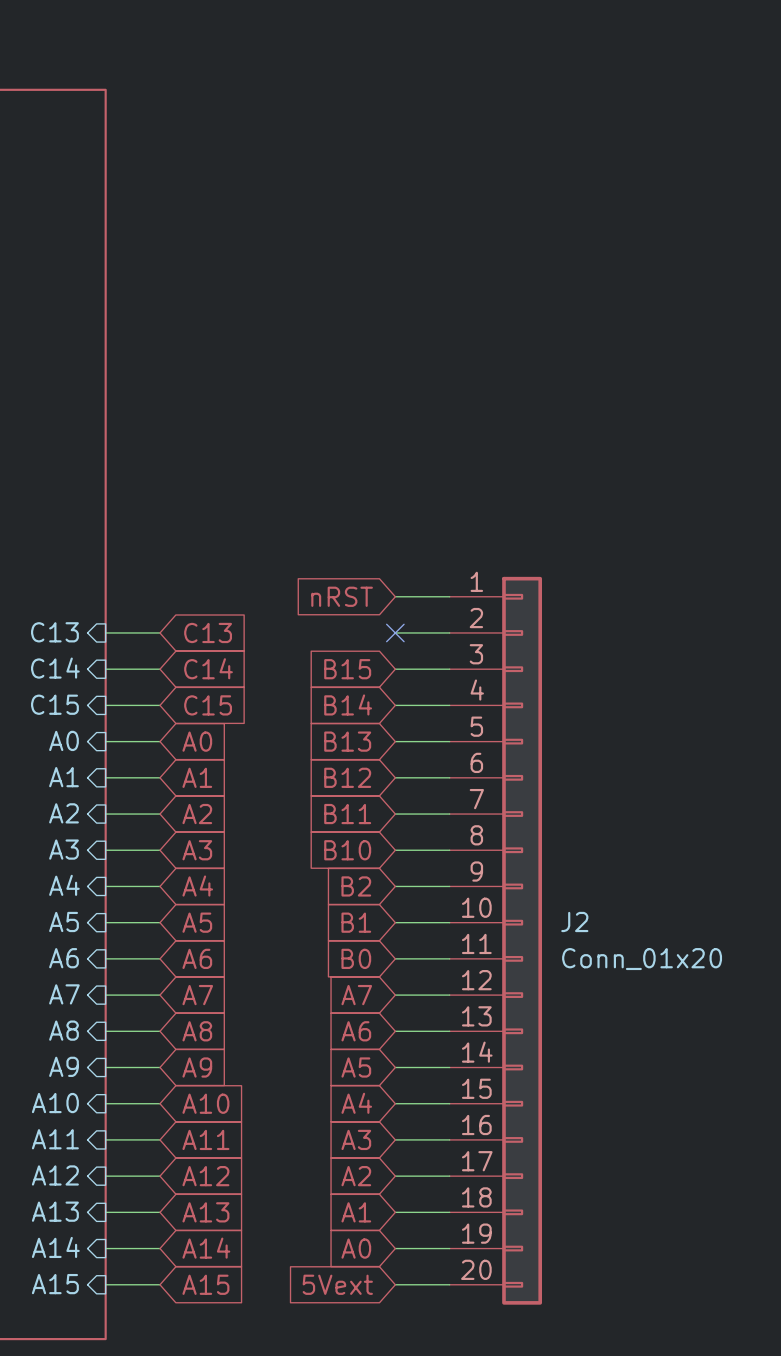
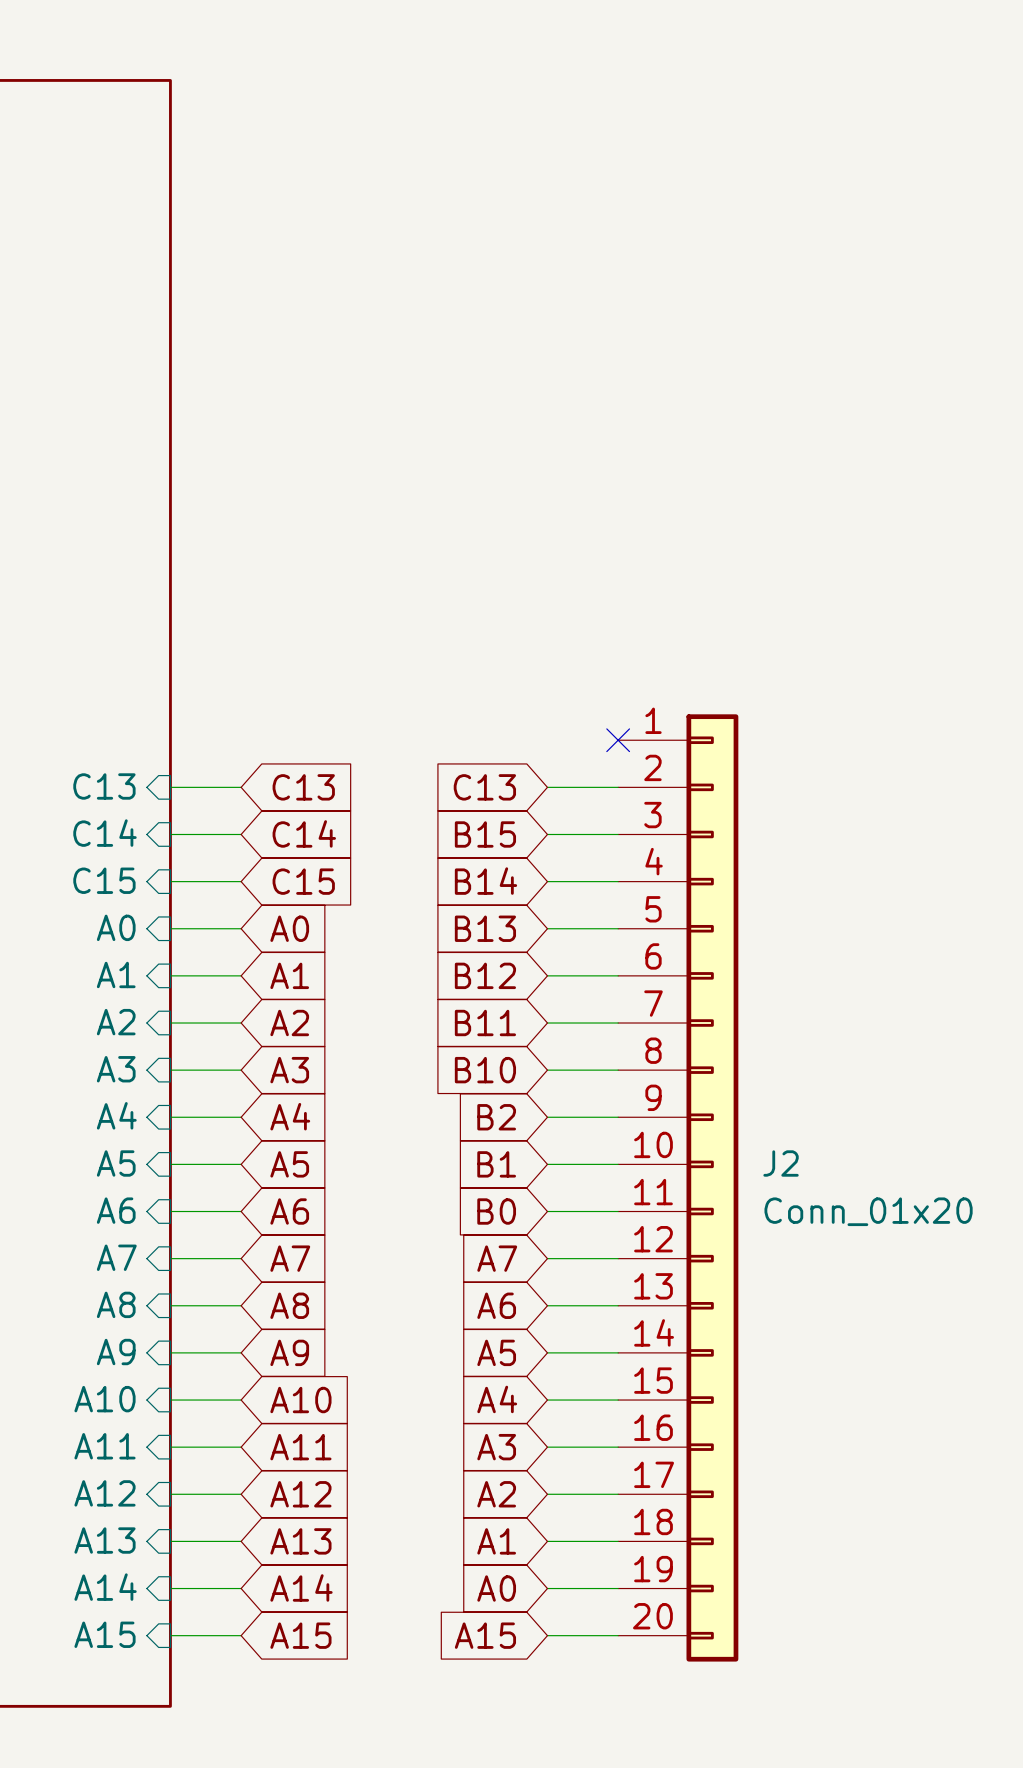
global label: nRST (342, 596) -> none
wire: (395, 596) (449, 596) -> none
global label: none -> C13 (484, 787)
no-connect mark position: (395, 632) -> (618, 740)
global label: 5Vext (337, 1284) -> A15 (485, 1635)

